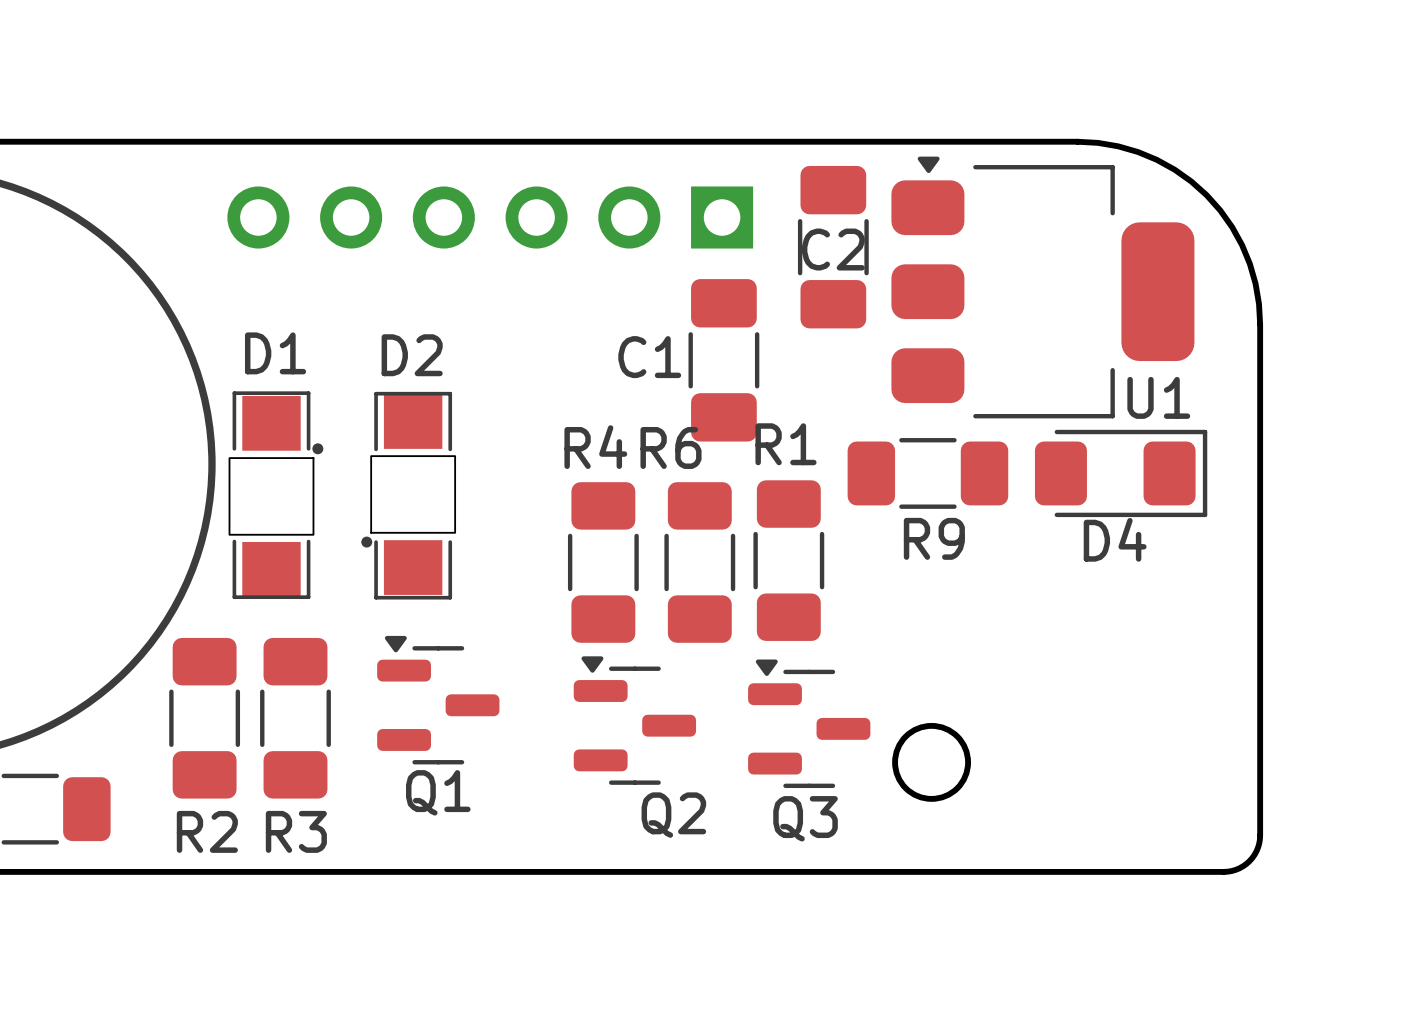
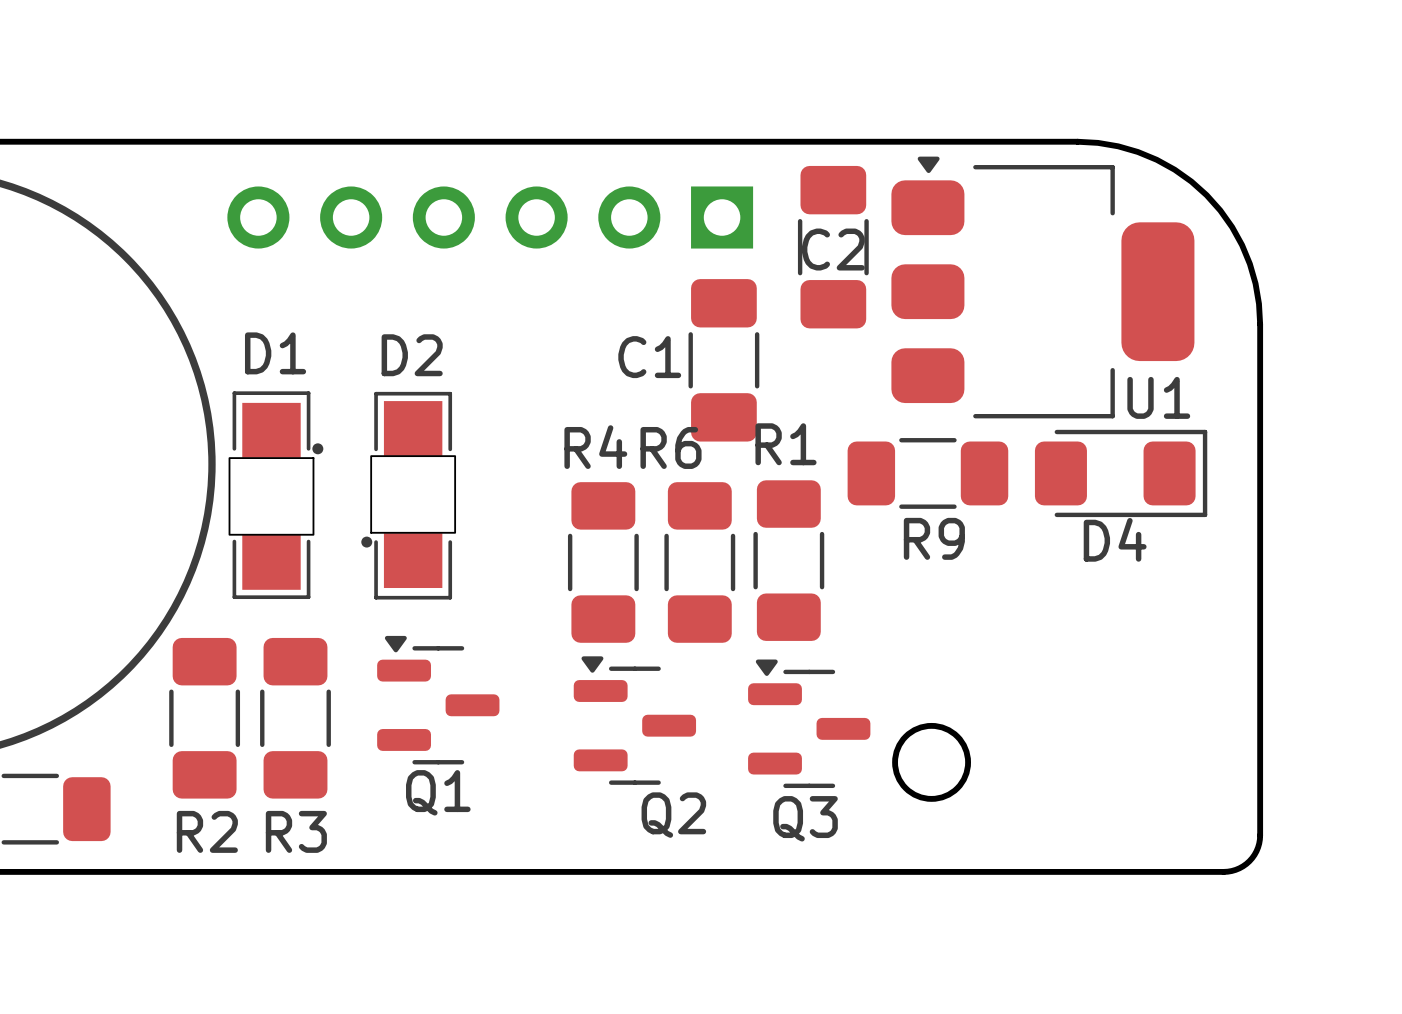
D1 footprint: [228, 391, 324, 600] -> [228, 391, 324, 600]
D2 footprint: [361, 391, 457, 600] -> [361, 391, 457, 600]

